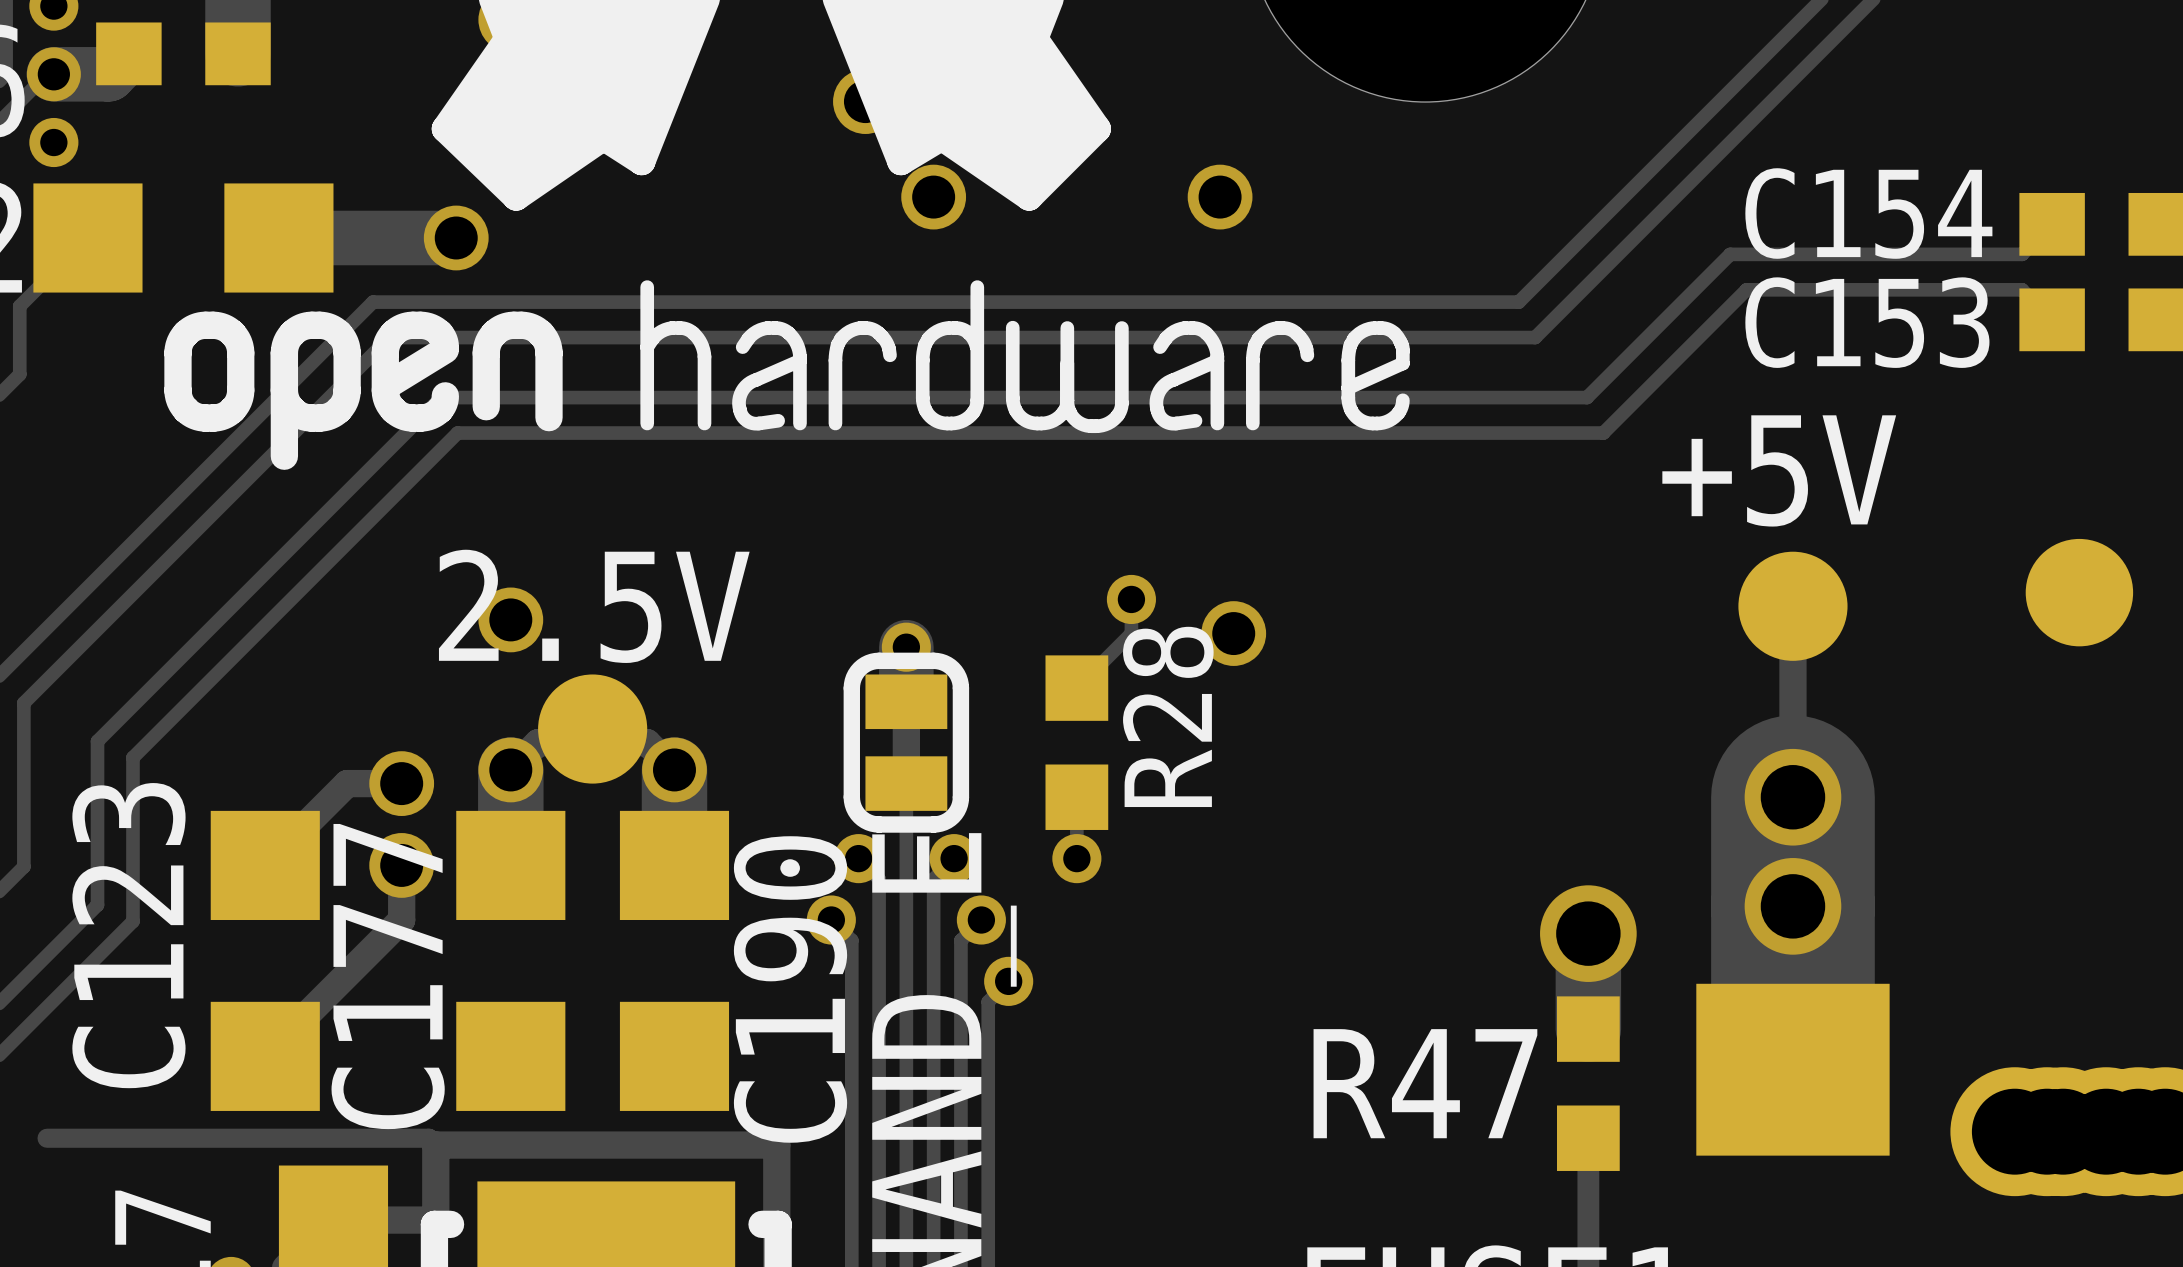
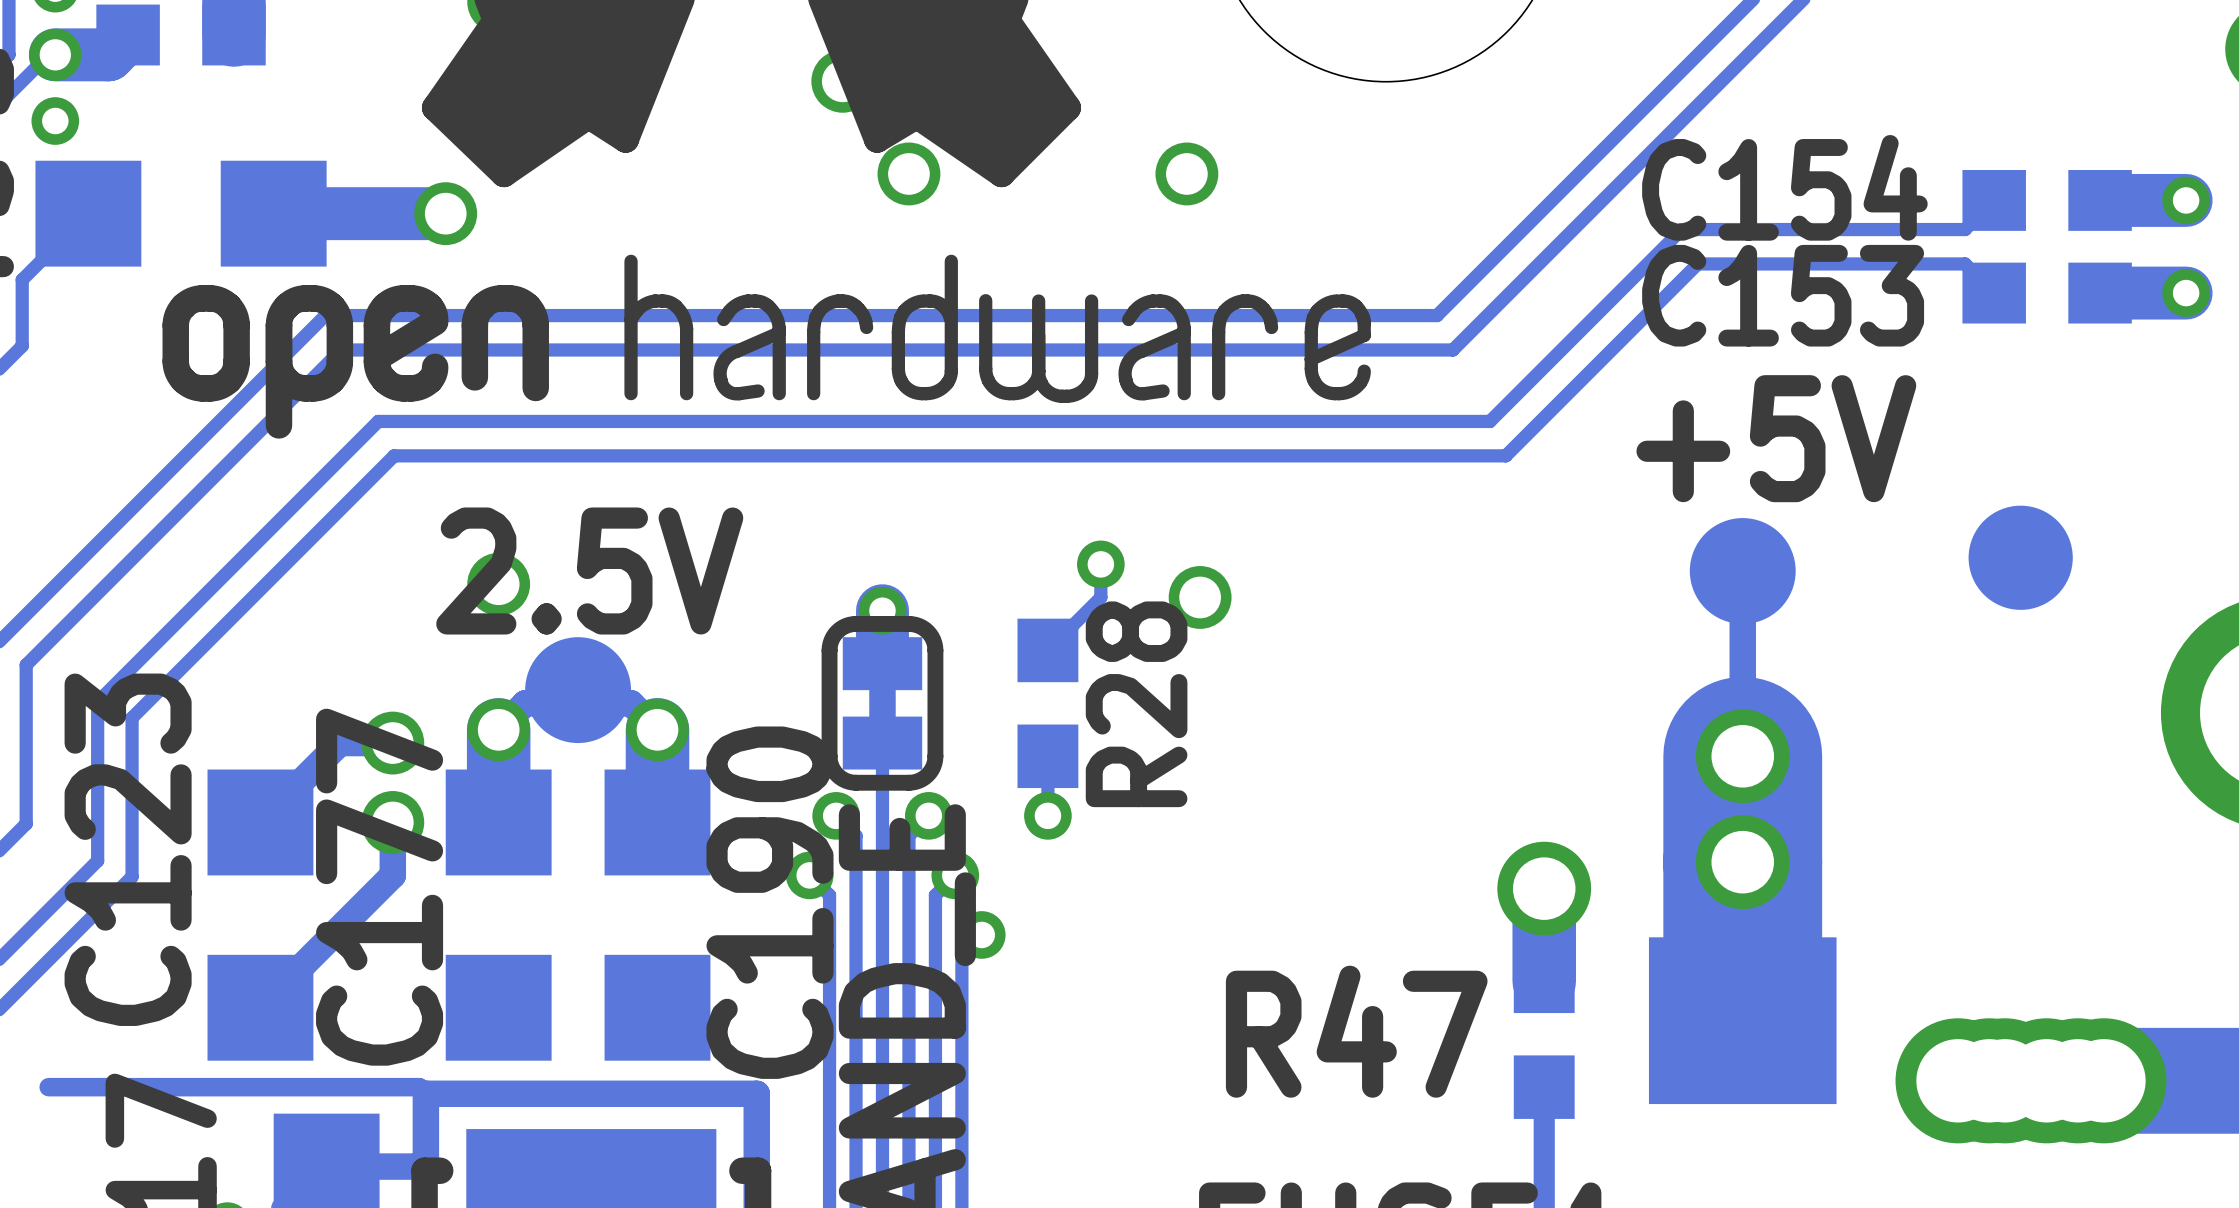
track: (1518, 302) (373, 302) (332, 343) -> (1476, 275) (1437, 315) (325, 315)
track: (1535, 337) (389, 337) (348, 378) -> (1492, 310) (1452, 349) (341, 349)
track: (1587, 397) (441, 397) (386, 452) -> (1542, 368) (1489, 421) (378, 421)
track: (1603, 433) (457, 433) (403, 487) -> (1558, 402) (1505, 455) (394, 455)

